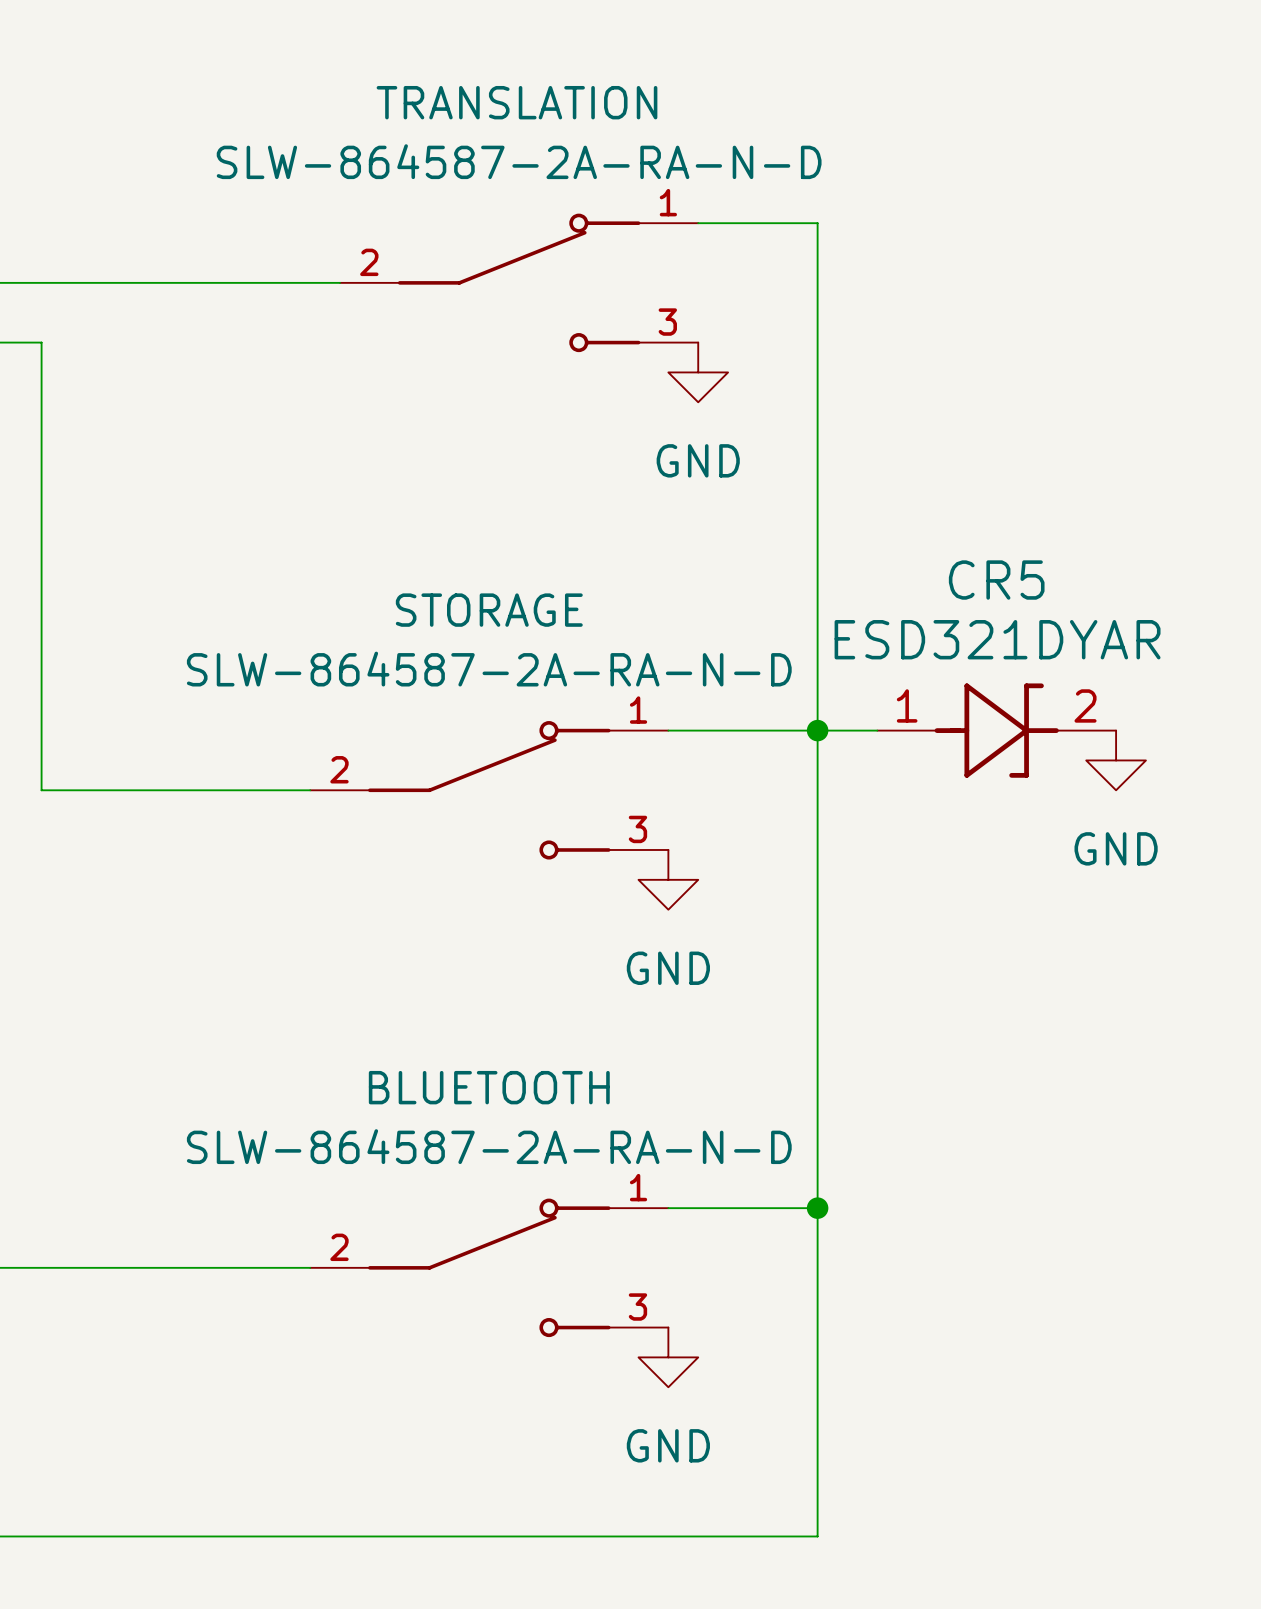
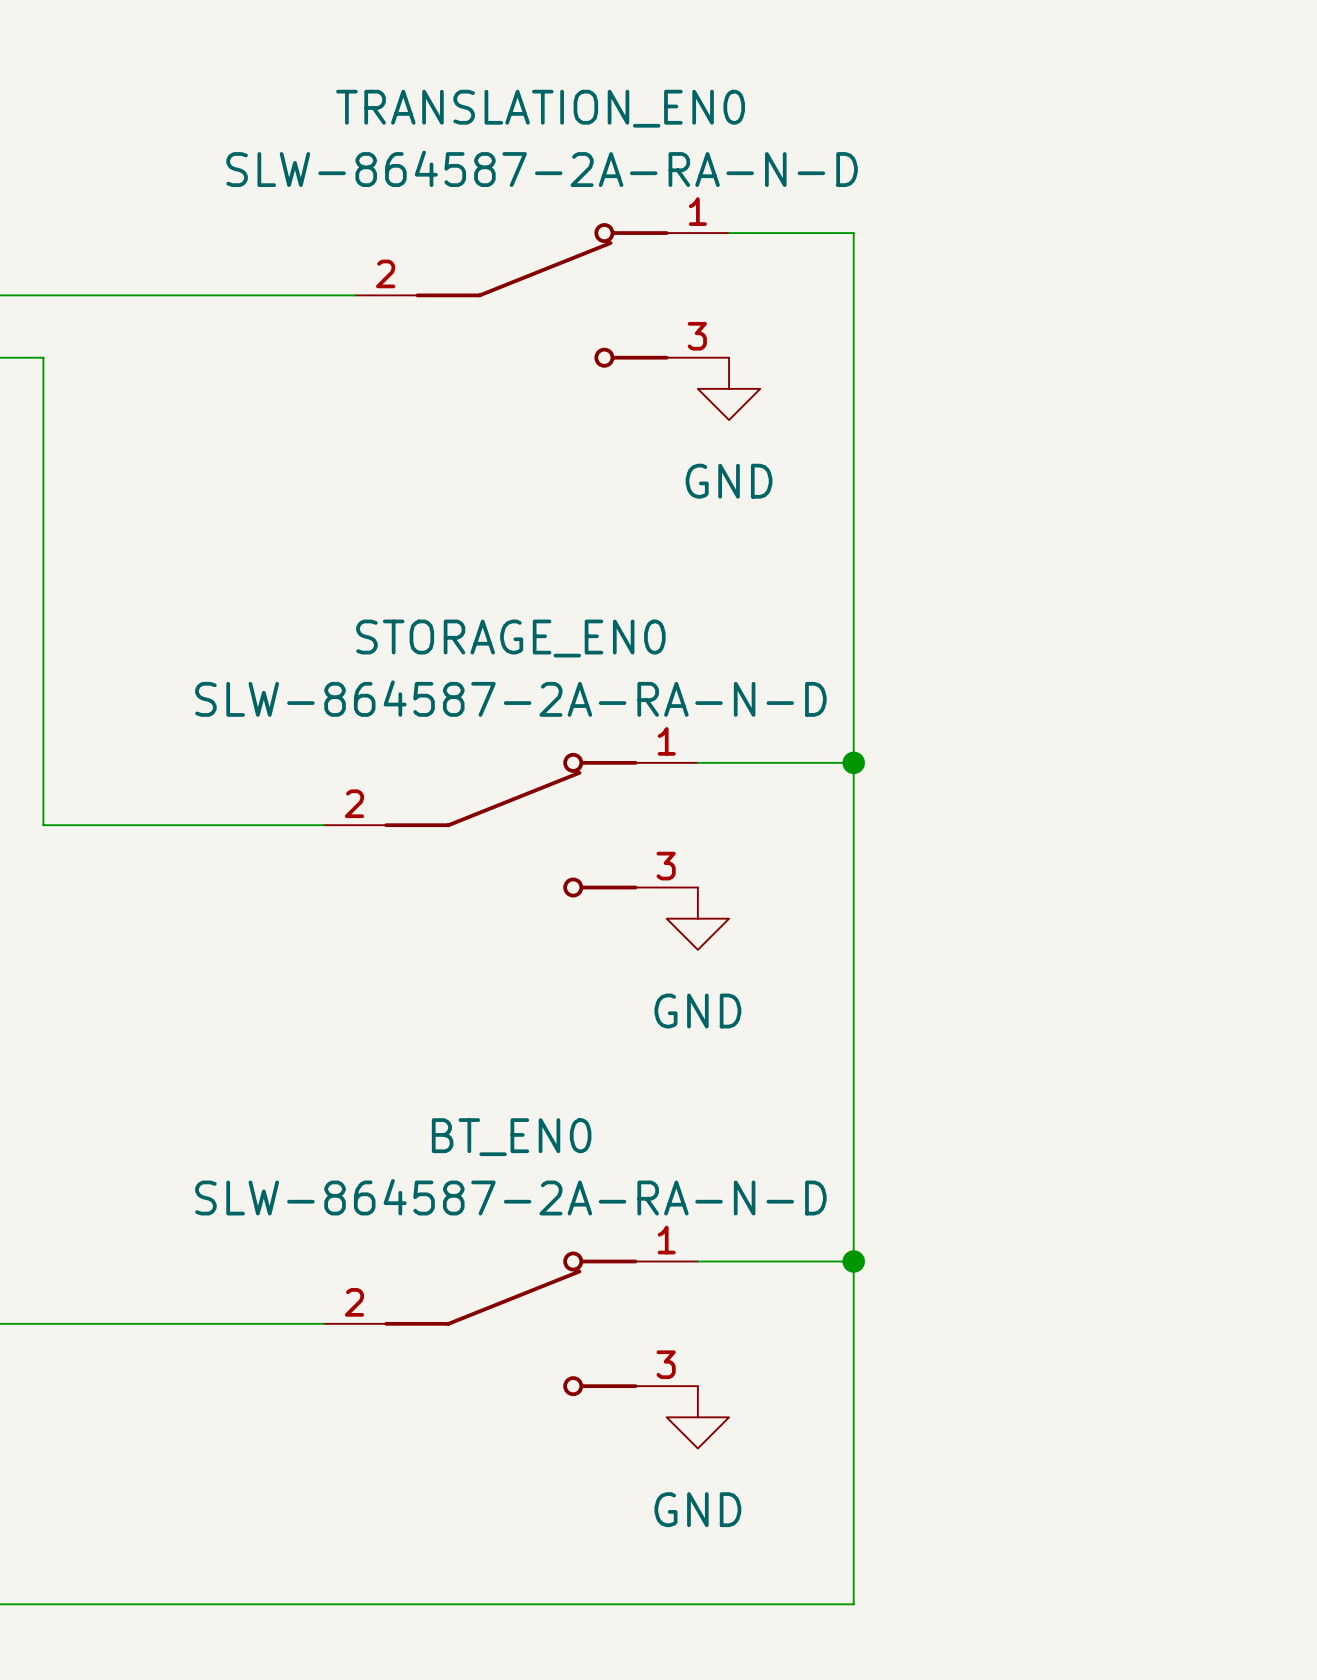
TRANSLATION name: TRANSLATION (517, 102) -> TRANSLATION_EN0 (540, 108)
STORAGE name: STORAGE (489, 610) -> STORAGE_EN0 (510, 638)
wire: (817, 730) (877, 730) -> none
CR5: ESD321DYAR (996, 730) -> none
power symbol: GND (1116, 760) -> none
BLUETOOTH name: BLUETOOTH (489, 1087) -> BT_EN0 (511, 1137)

